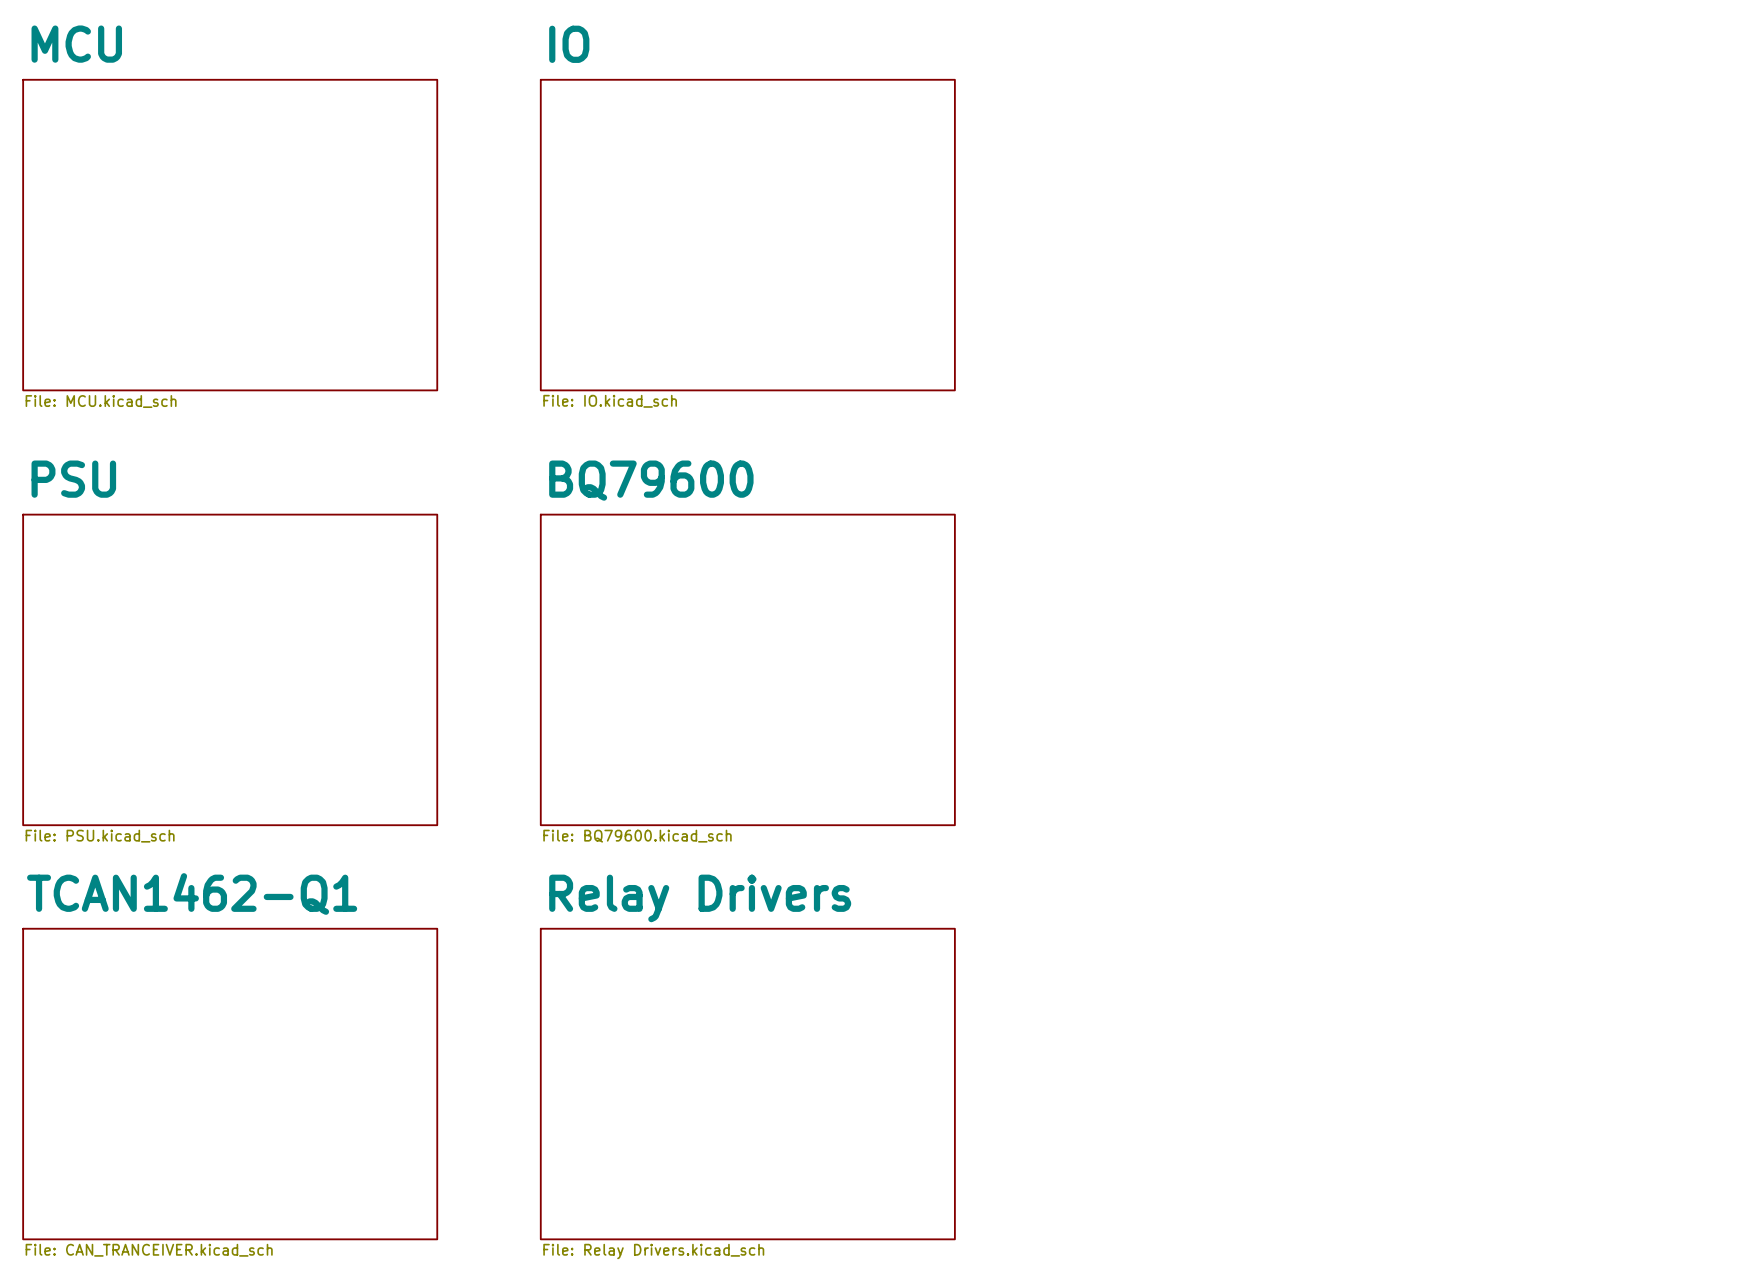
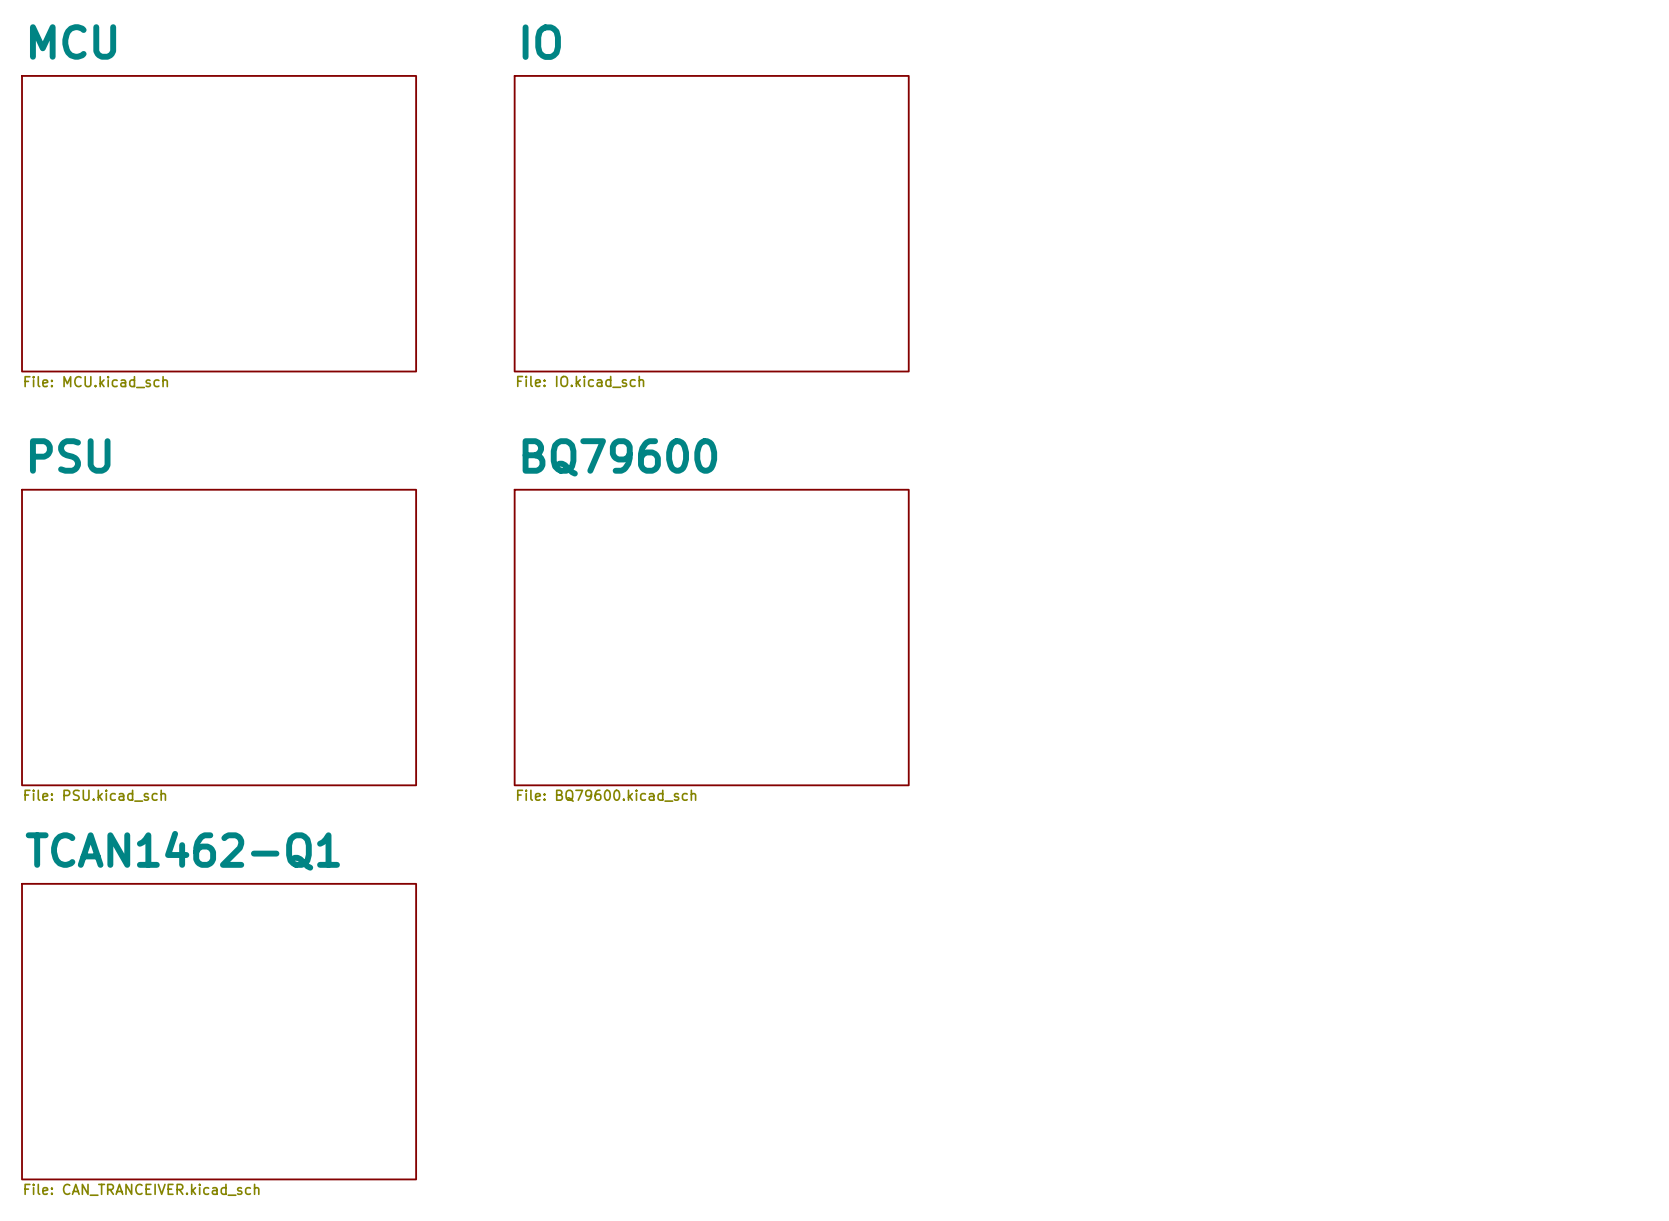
sheet Relay Drivers: File: Relay Drivers.kicad_sch (747, 1084) -> none

